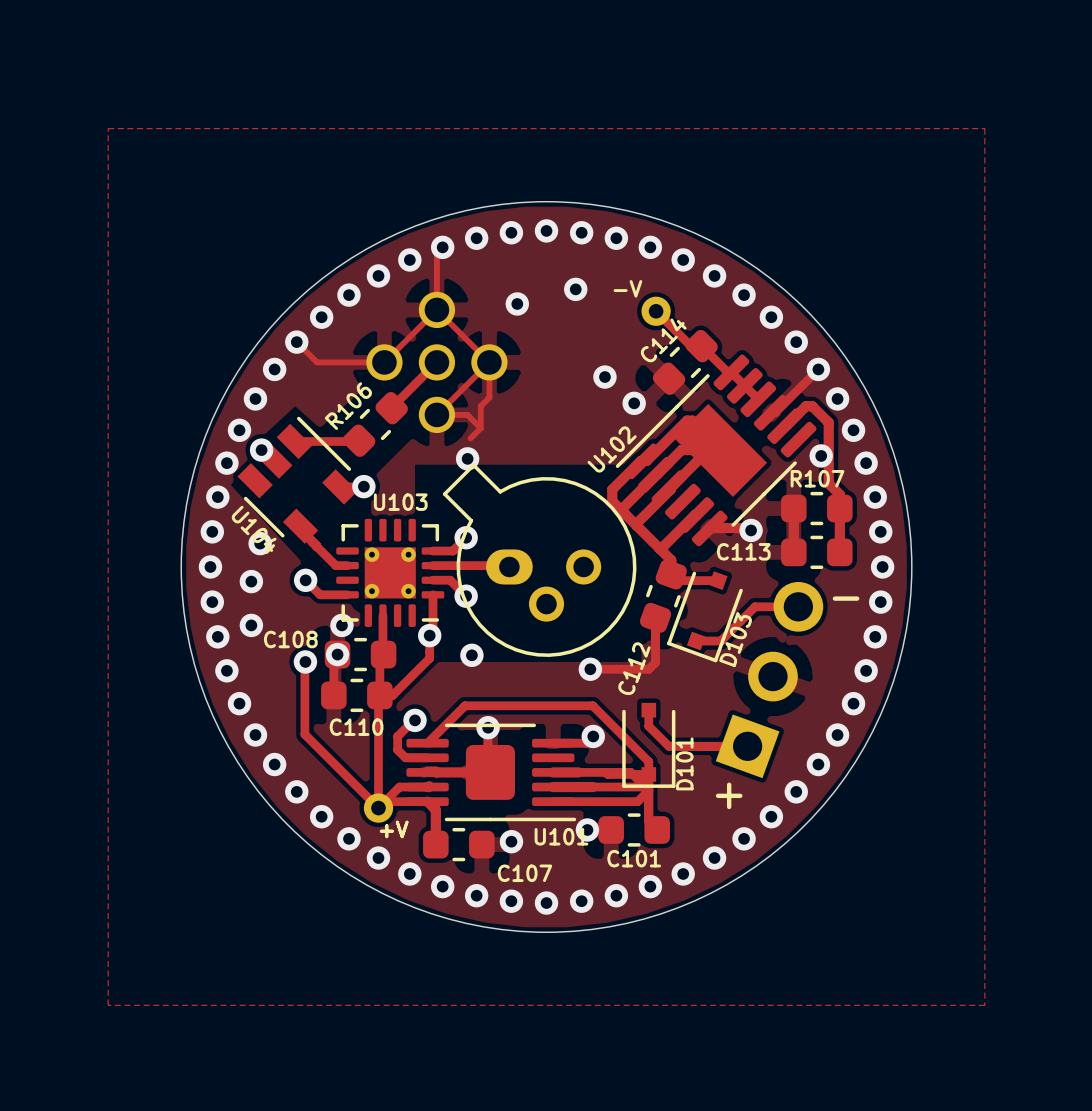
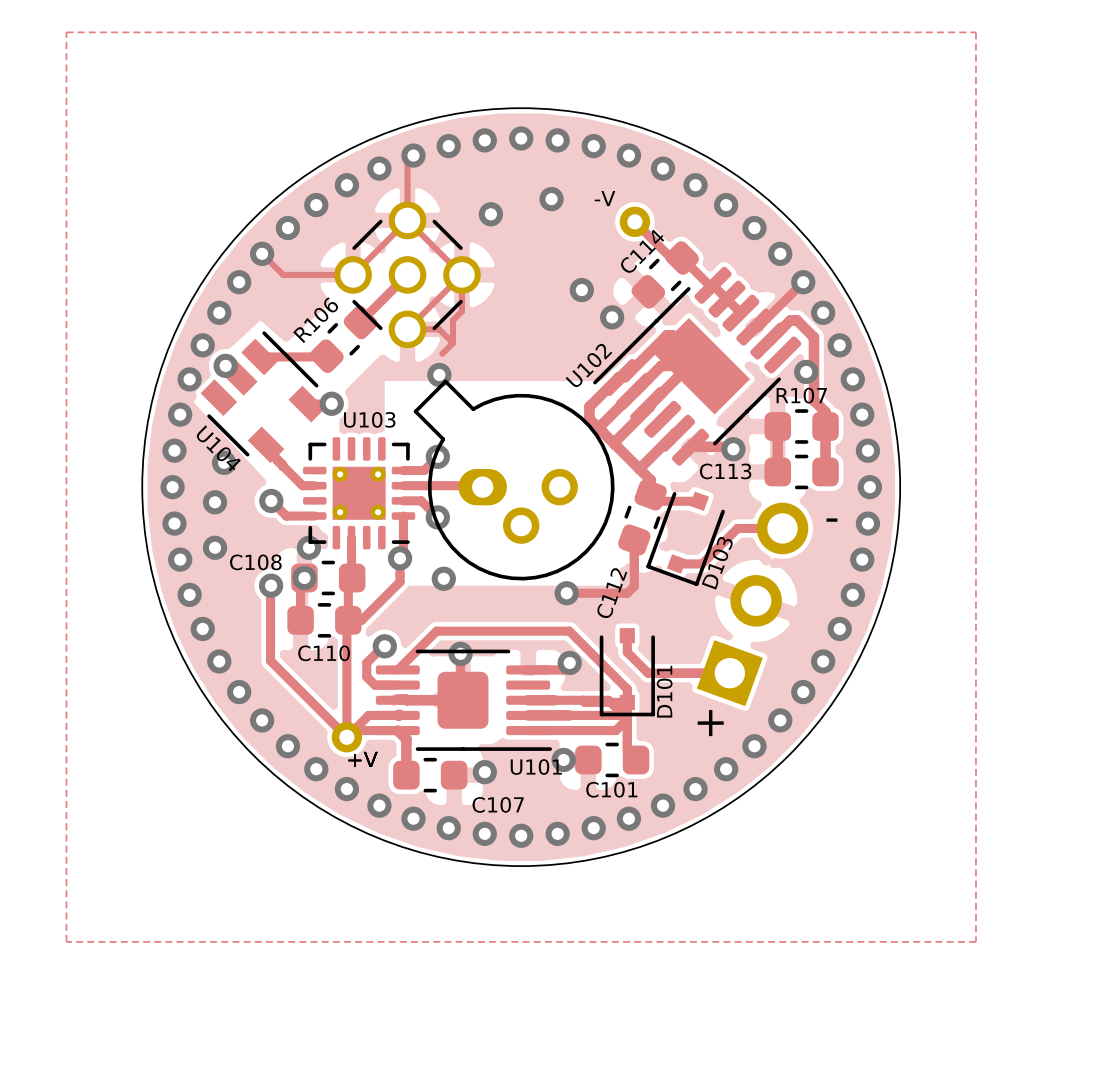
part side: bottom (436, 362) -> top (407, 274)

